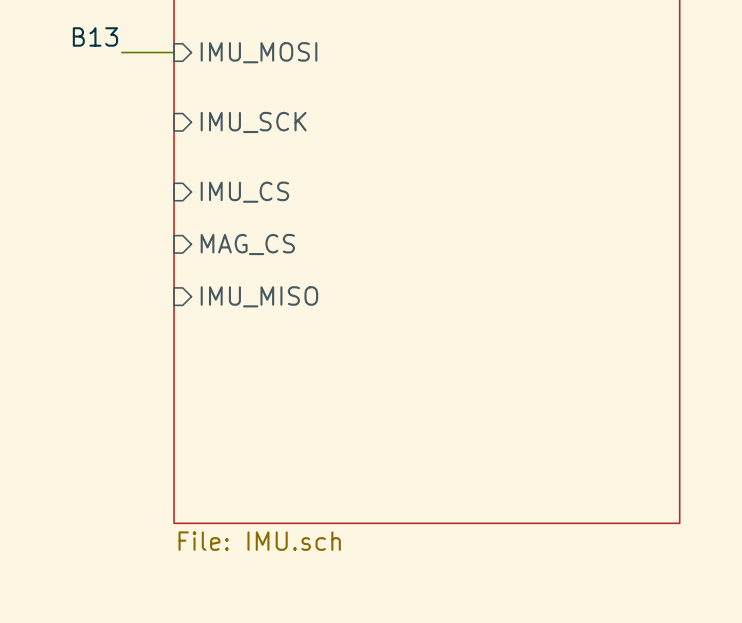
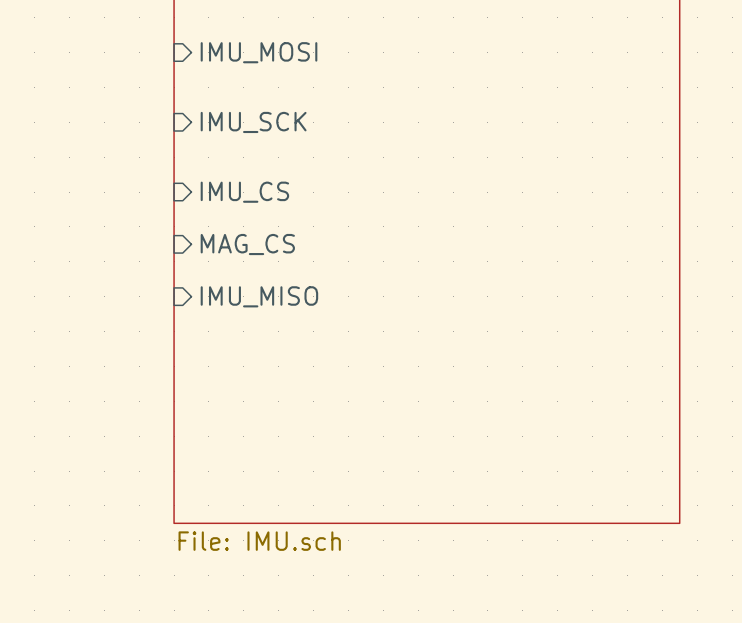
label: B13 (95, 36) -> none
wire: (121, 52) (174, 52) -> none

